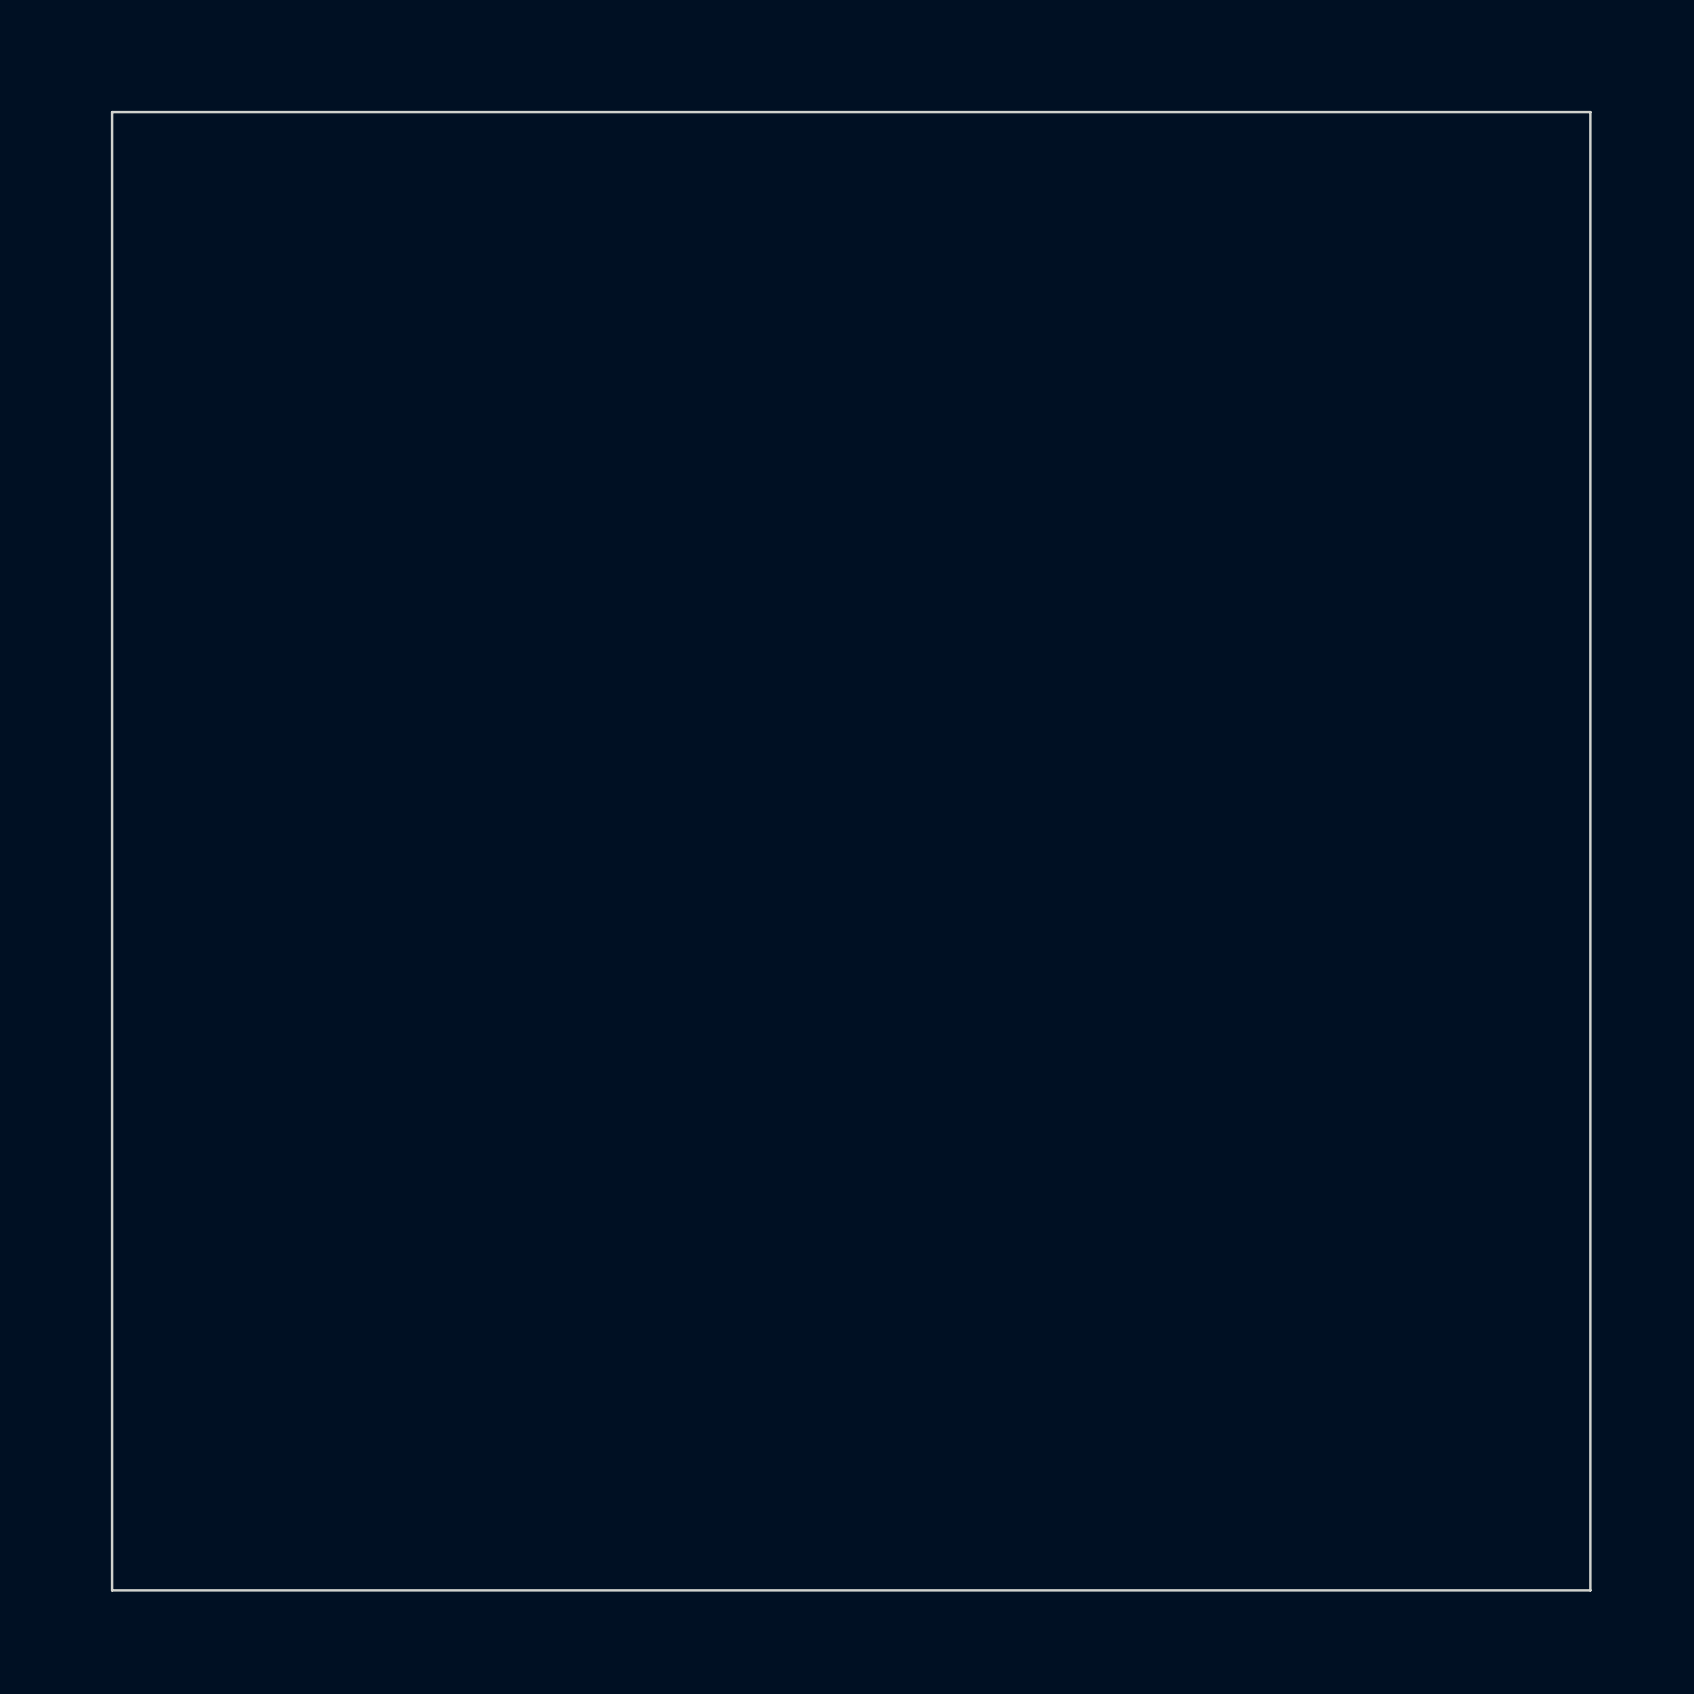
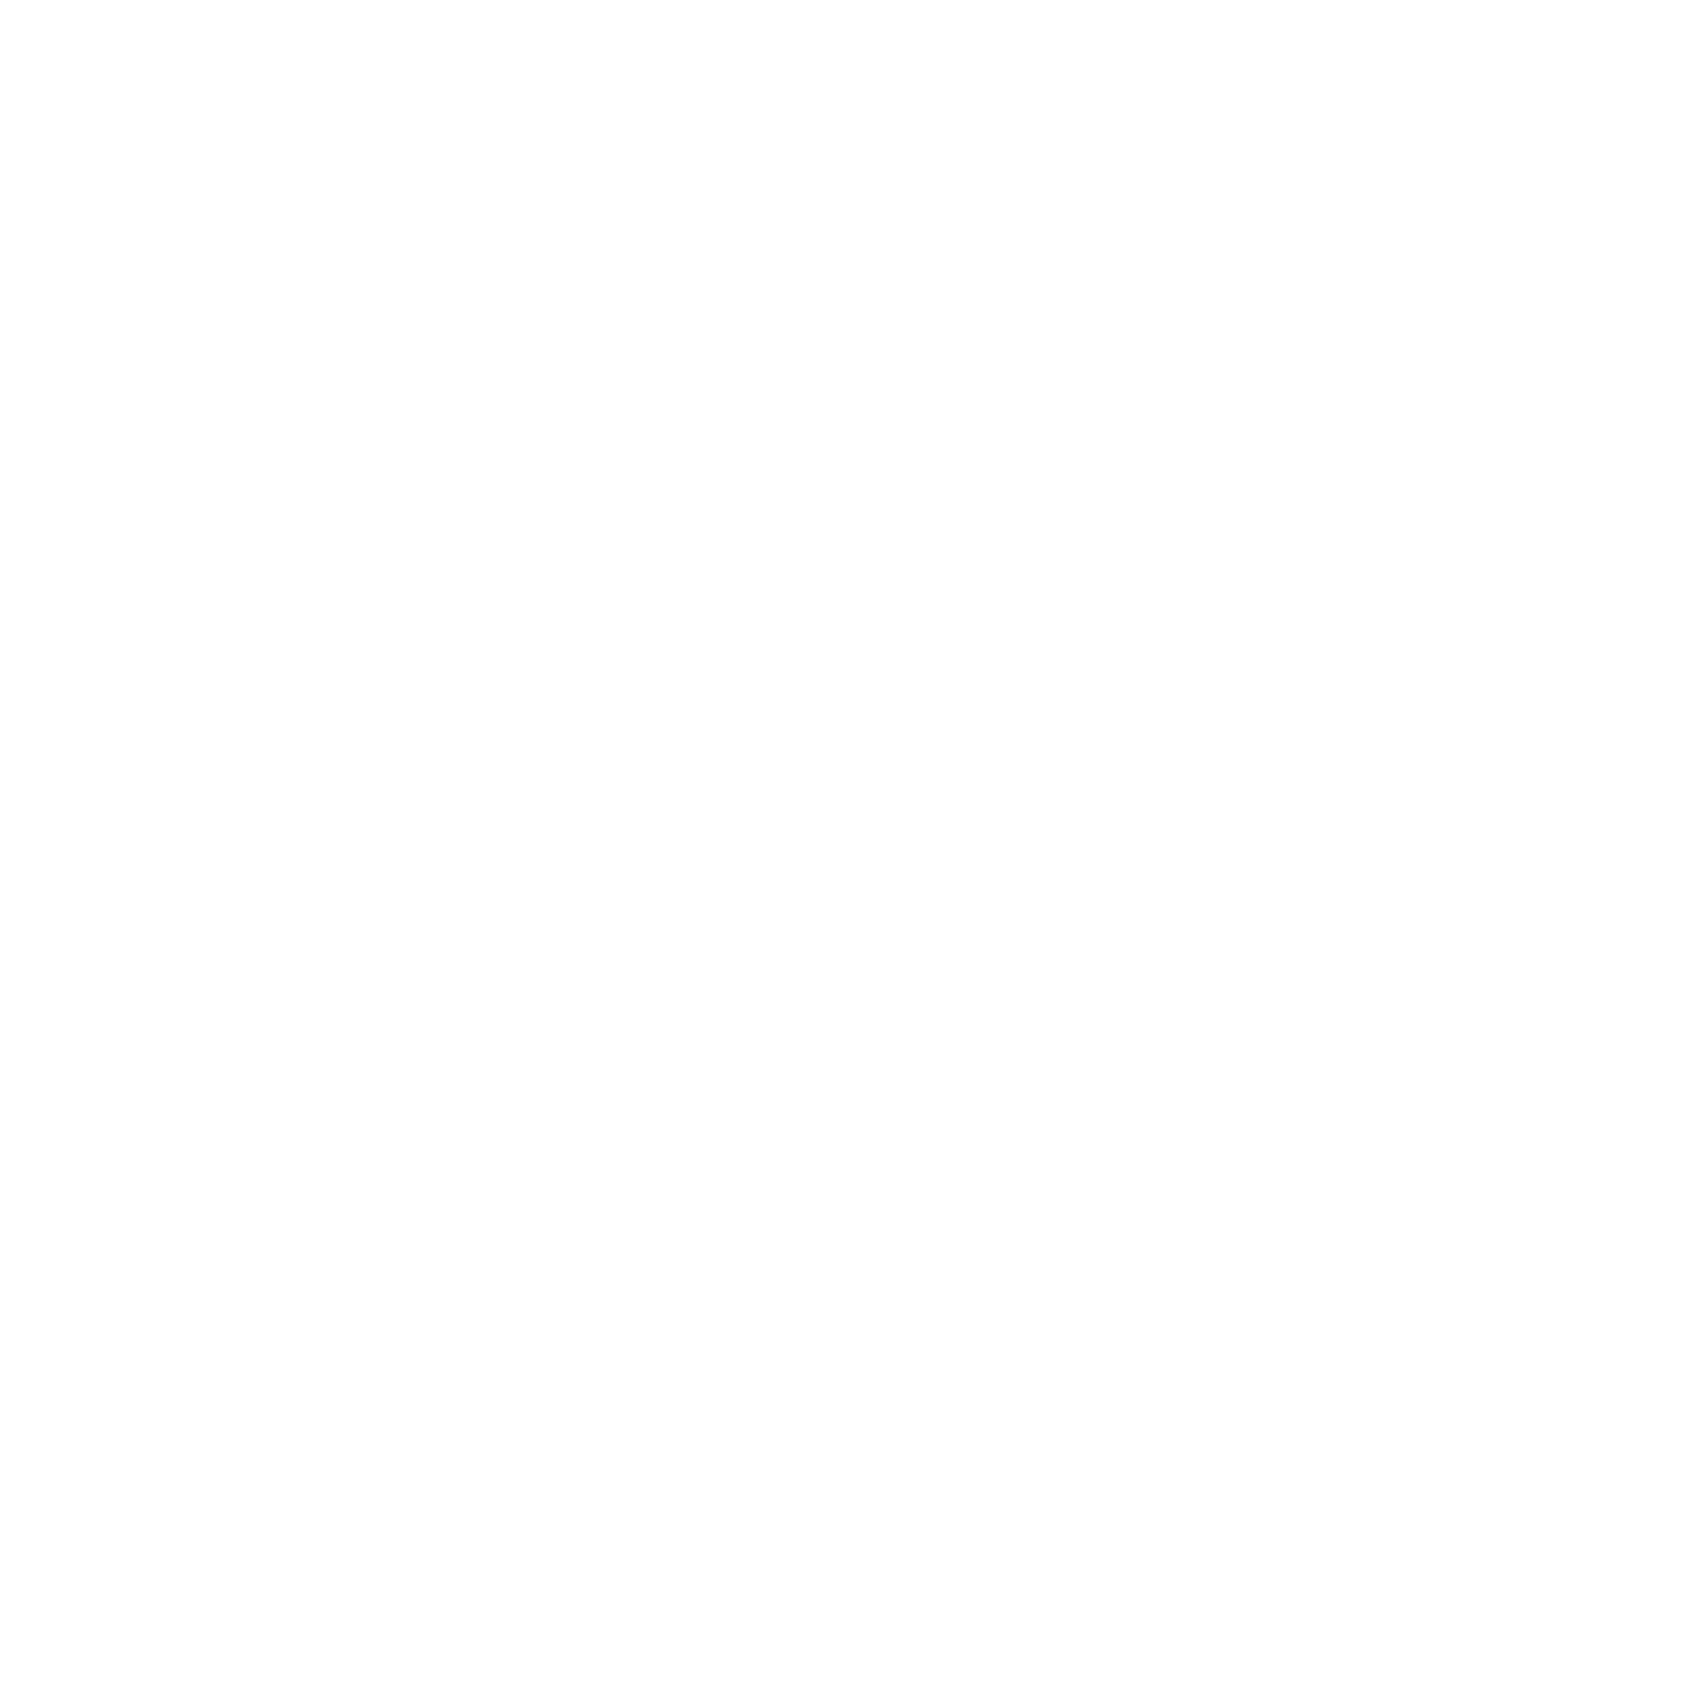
board edge: (112, 112) (1590, 112) (1590, 1590) (112, 1590) (112, 112) -> none

